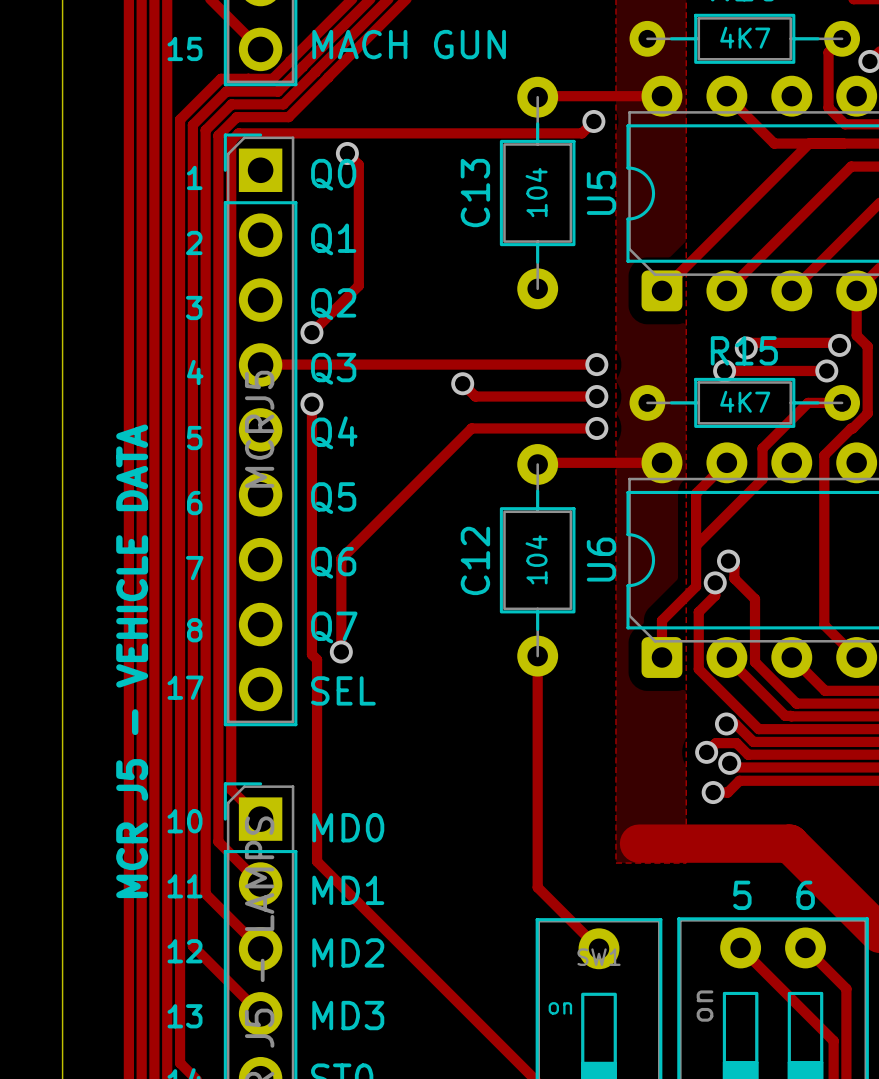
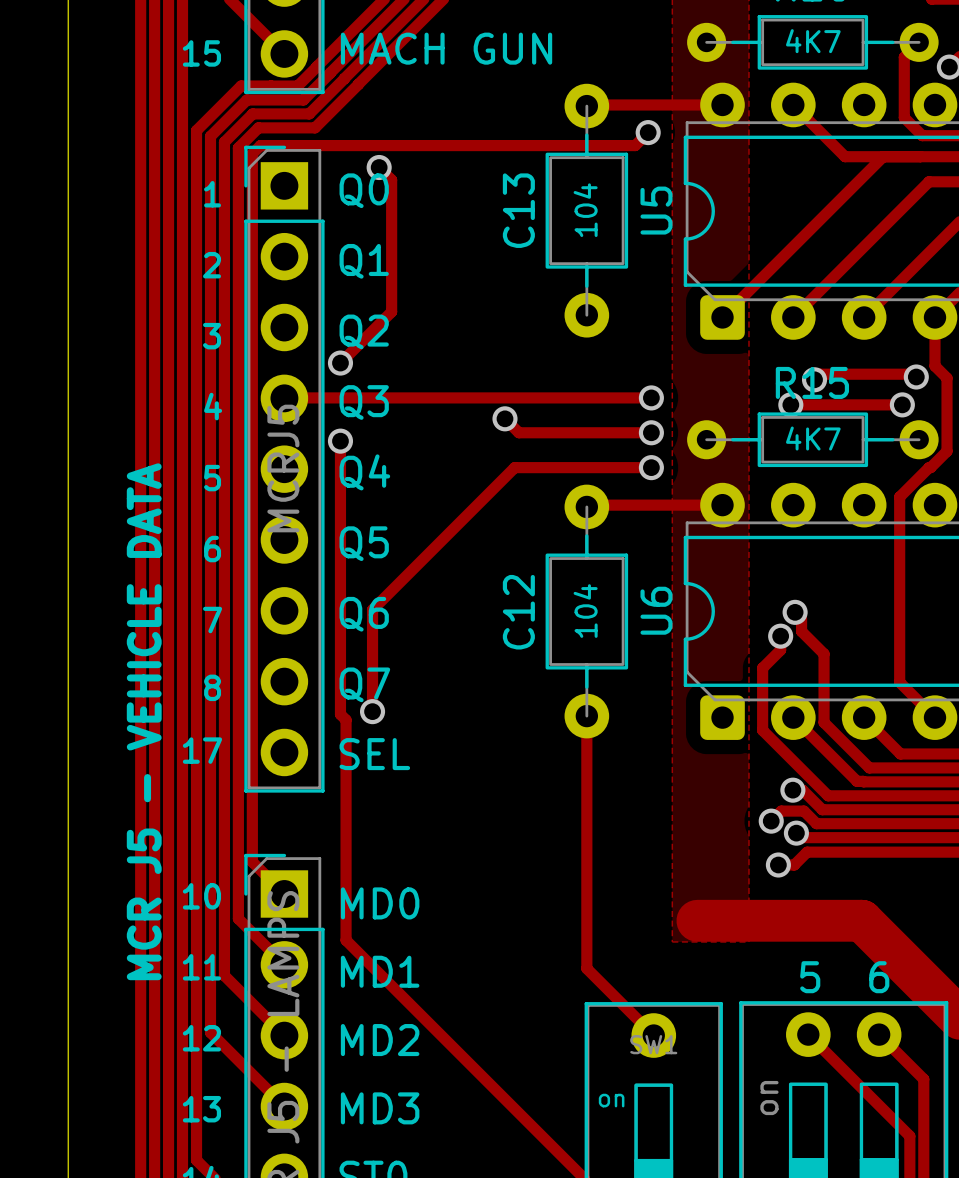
track: (842, 402) (808, 402) (762, 448) (762, 479) (696, 545) -> none
track: (726, 462) (696, 493) (696, 586) (661, 620) (661, 657) -> none

